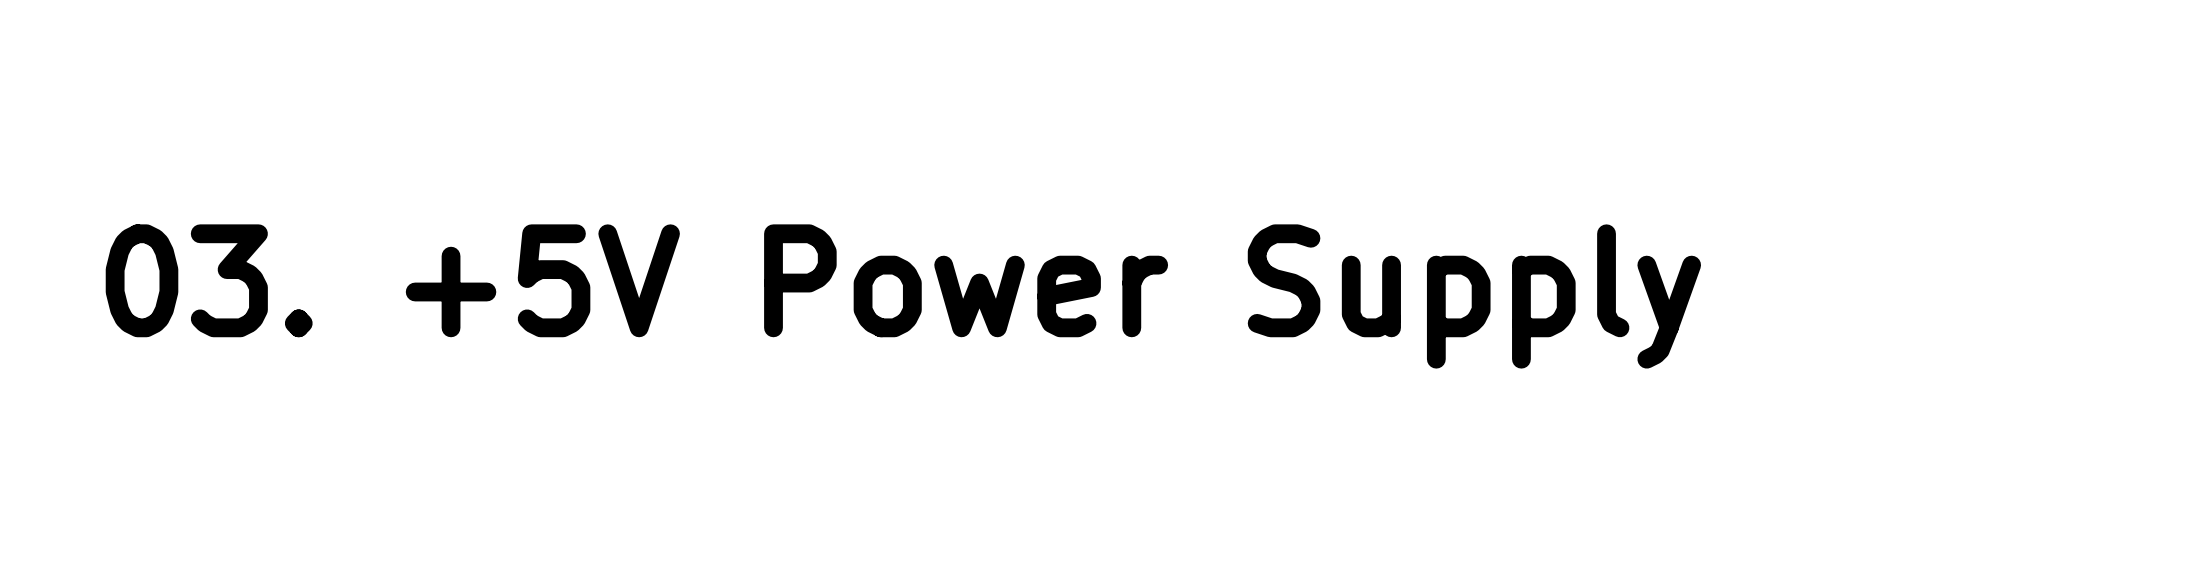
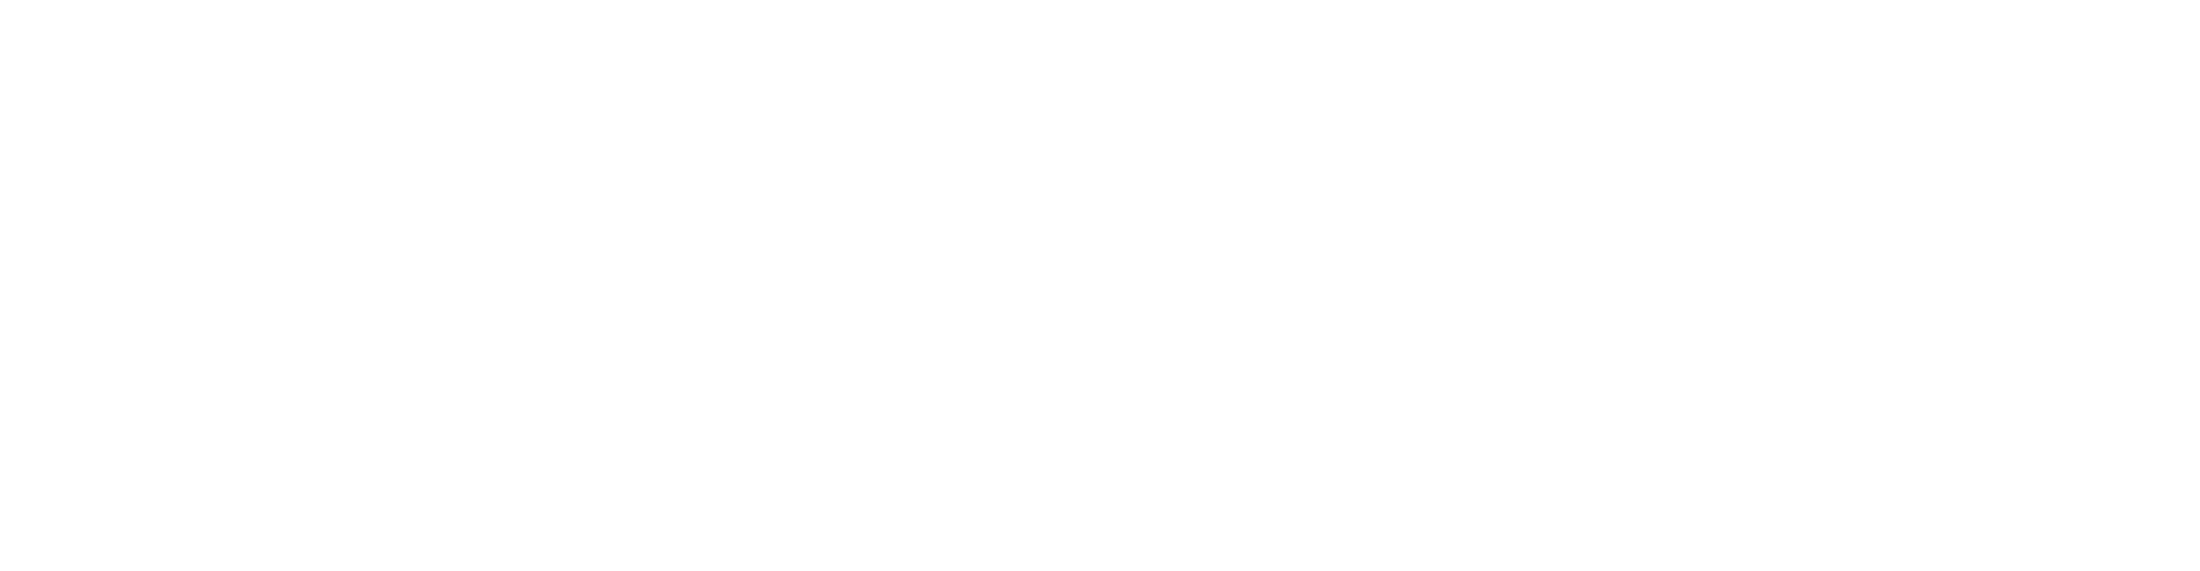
text: 03. +5V Power Supply (903, 296) -> none

